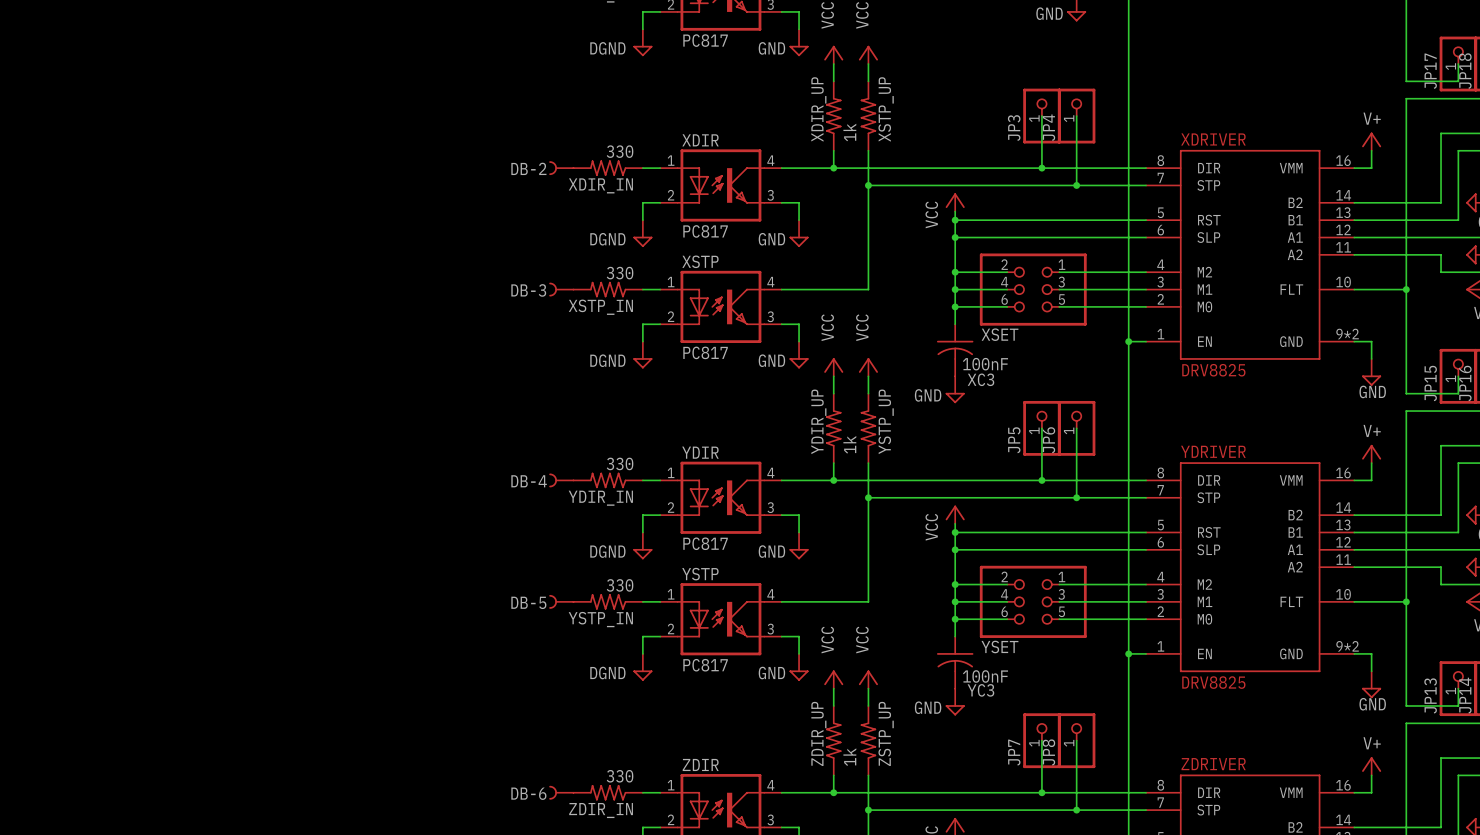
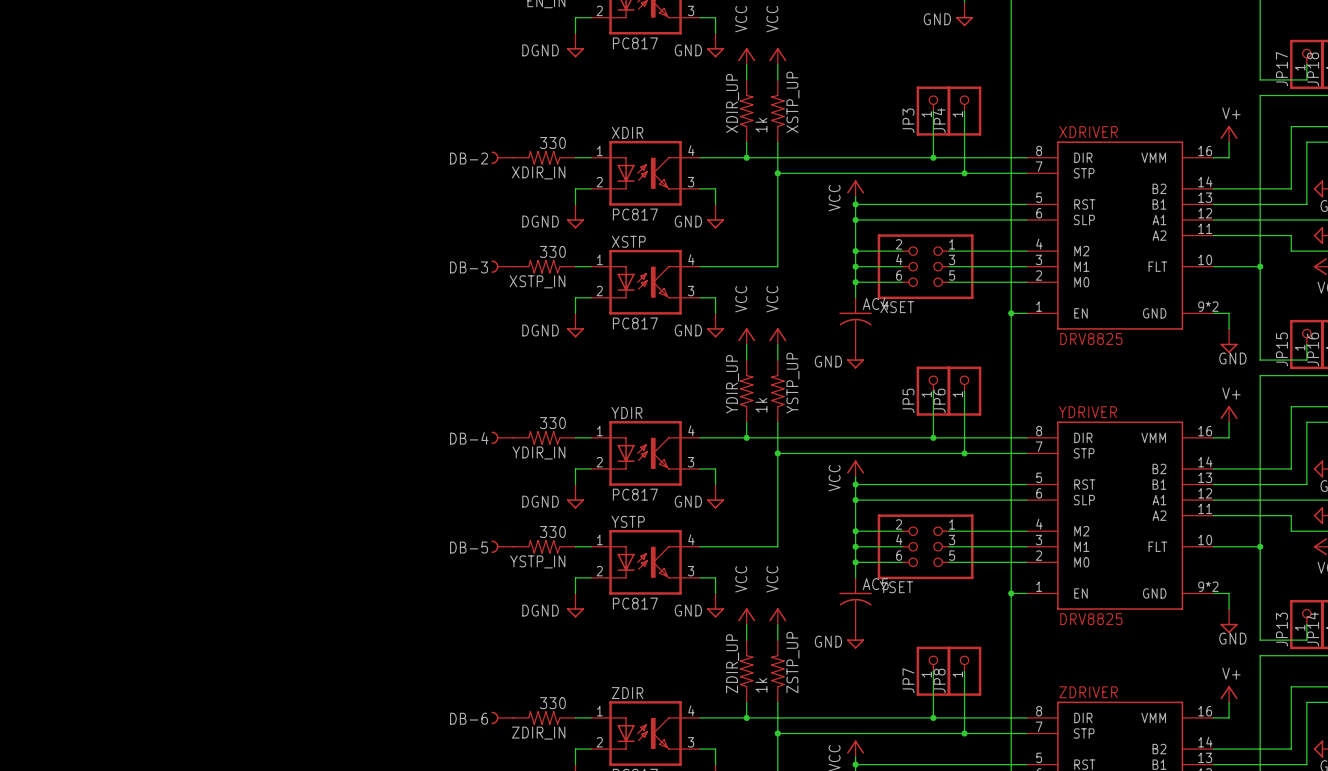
XC3 value: 100nF (985, 364) -> none
XC3 name: XC3 (980, 379) -> AC4 (875, 303)
YC3 value: 100nF (985, 676) -> none
YC3 name: YC3 (980, 690) -> AC5 (875, 584)

